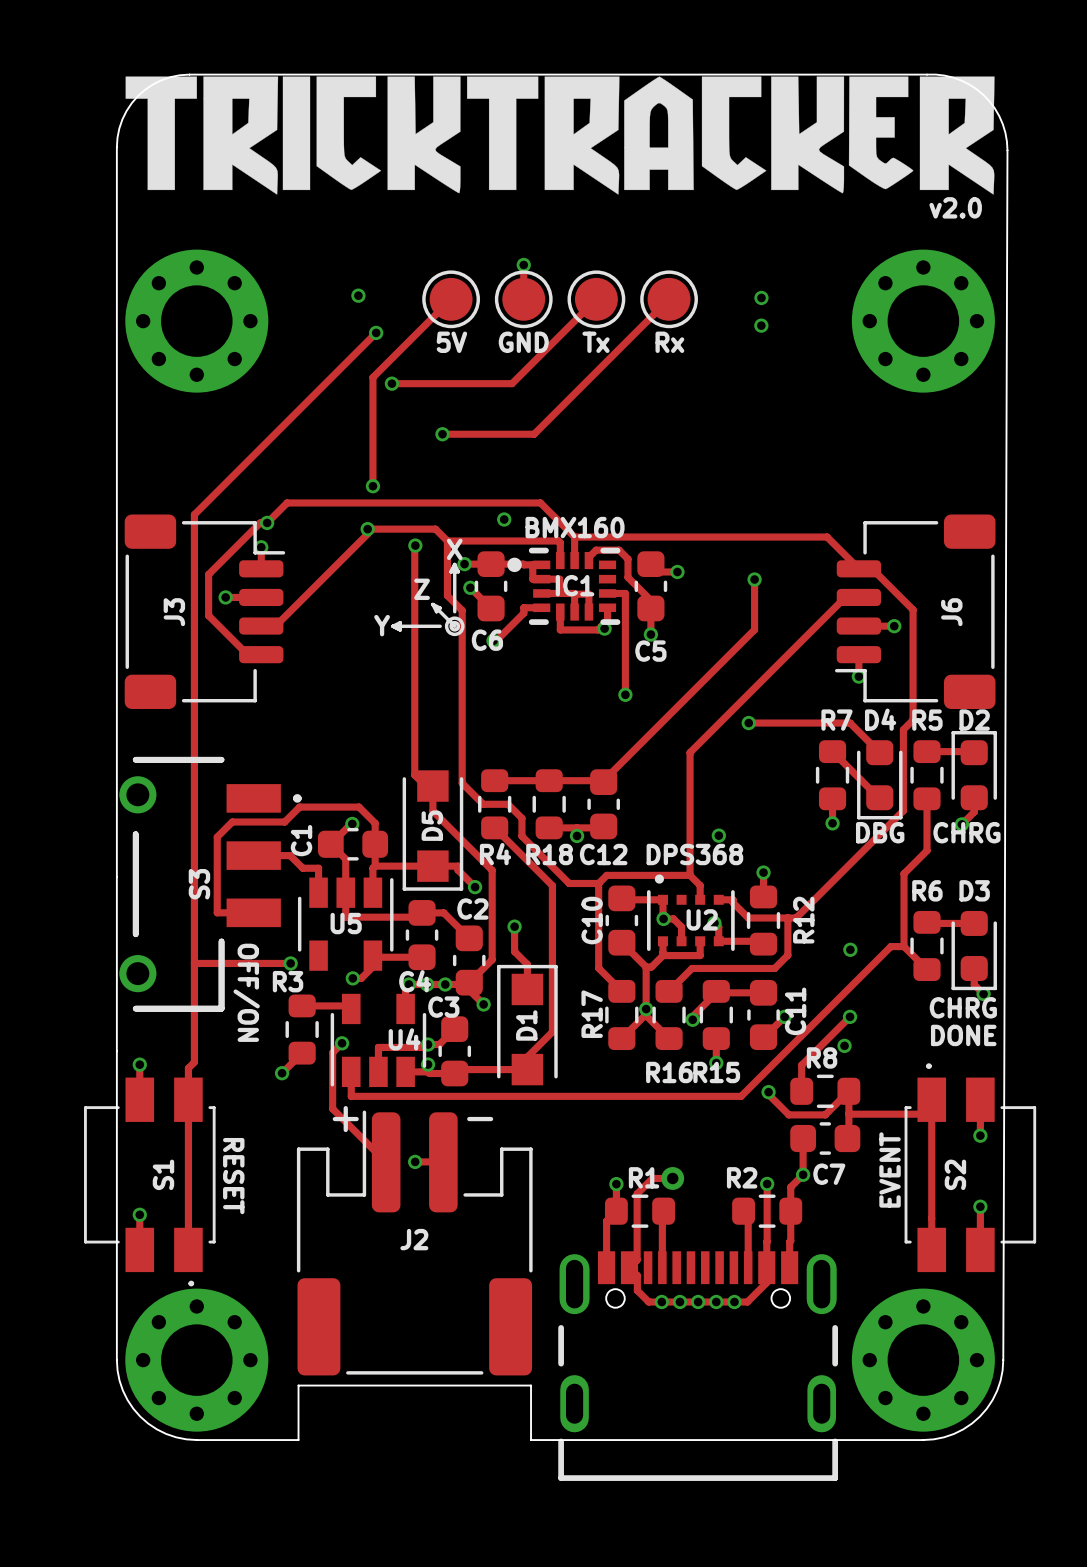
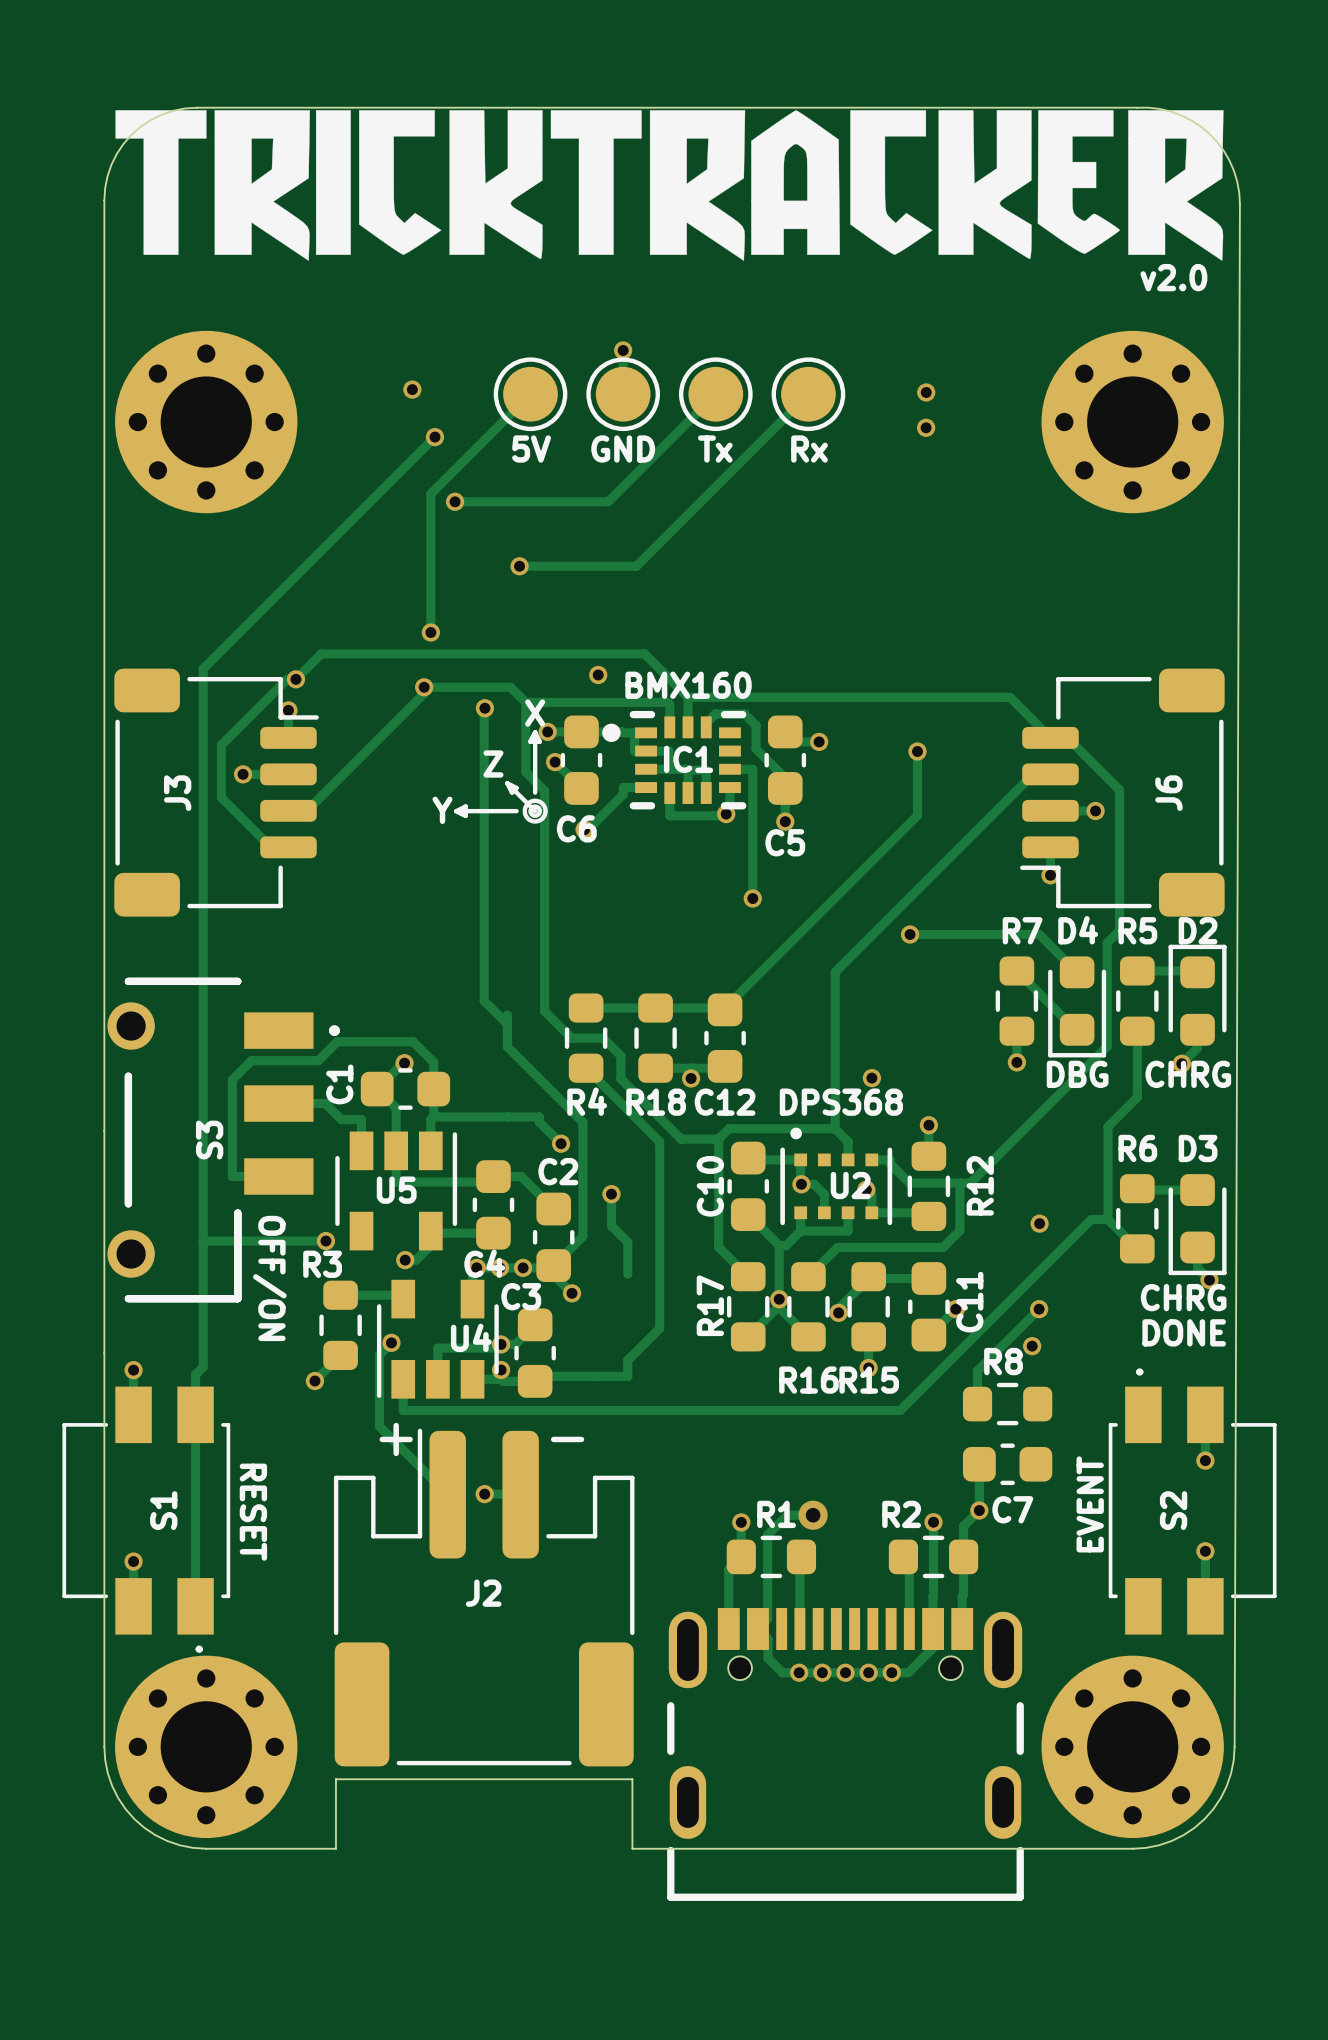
D5: (432, 830) -> none
D1: (527, 1025) -> none
track: (768, 1092) (768, 1094) (788, 1114) (825, 1114) (848, 1091) (847, 1138) -> none
via: (768, 1092) -> none
track: (931, 1099) (931, 1249) -> none
track: (848, 1114) (931, 1114) -> none

